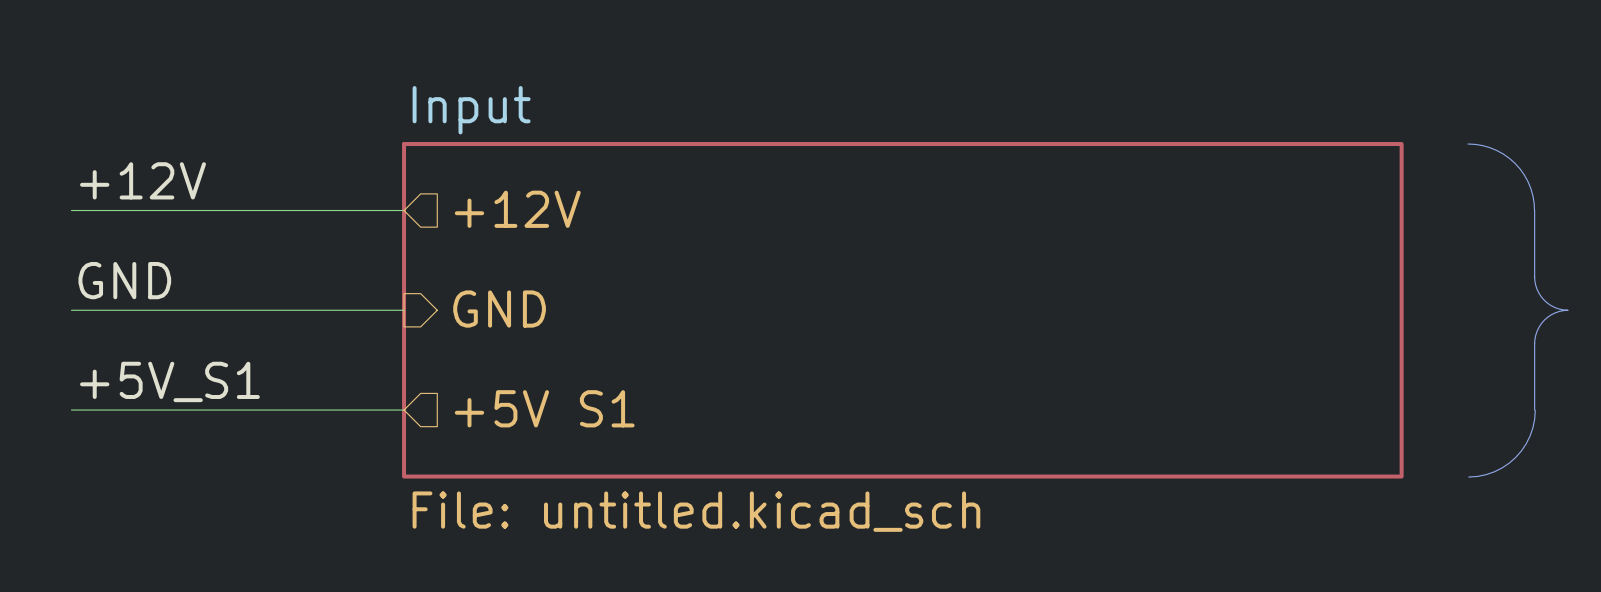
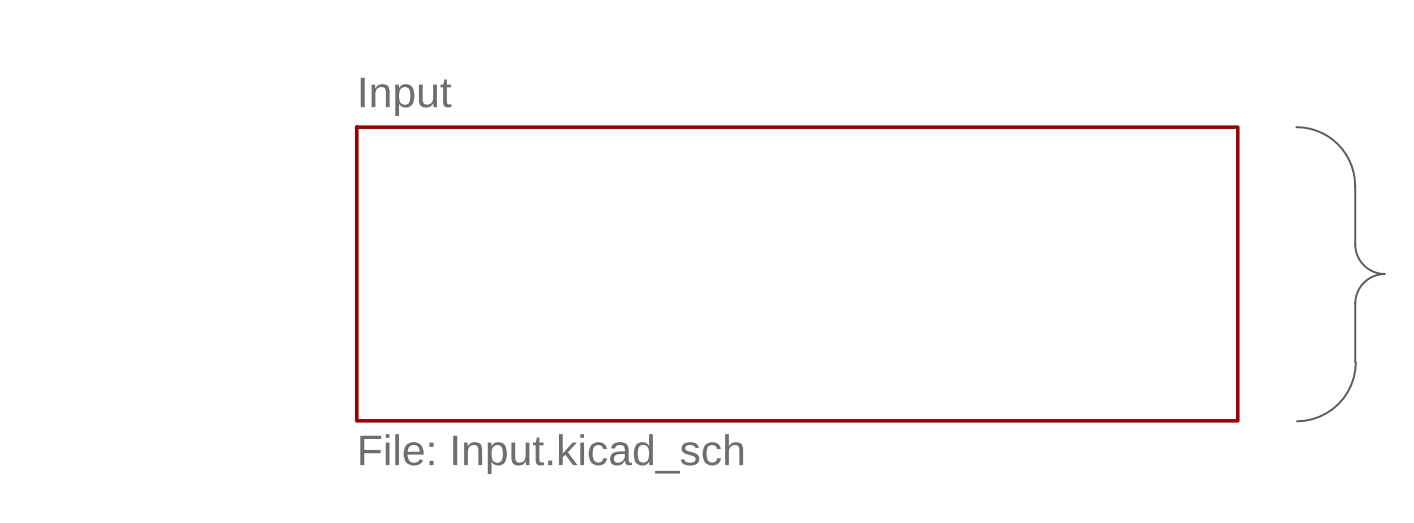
label: +12V (143, 180) -> none
hierarchical label: +12V (517, 209) -> none
wire: (71, 210) (404, 210) -> none
label: GND (124, 280) -> none
hierarchical label: GND (499, 309) -> none
wire: (71, 310) (404, 310) -> none
label: +5V_S1 (169, 381) -> none
hierarchical label: +5V S1 (544, 408) -> none
wire: (71, 410) (404, 410) -> none
sheet Input value: File: untitled.kicad_sch (696, 511) -> File: Input.kicad_sch (551, 454)

